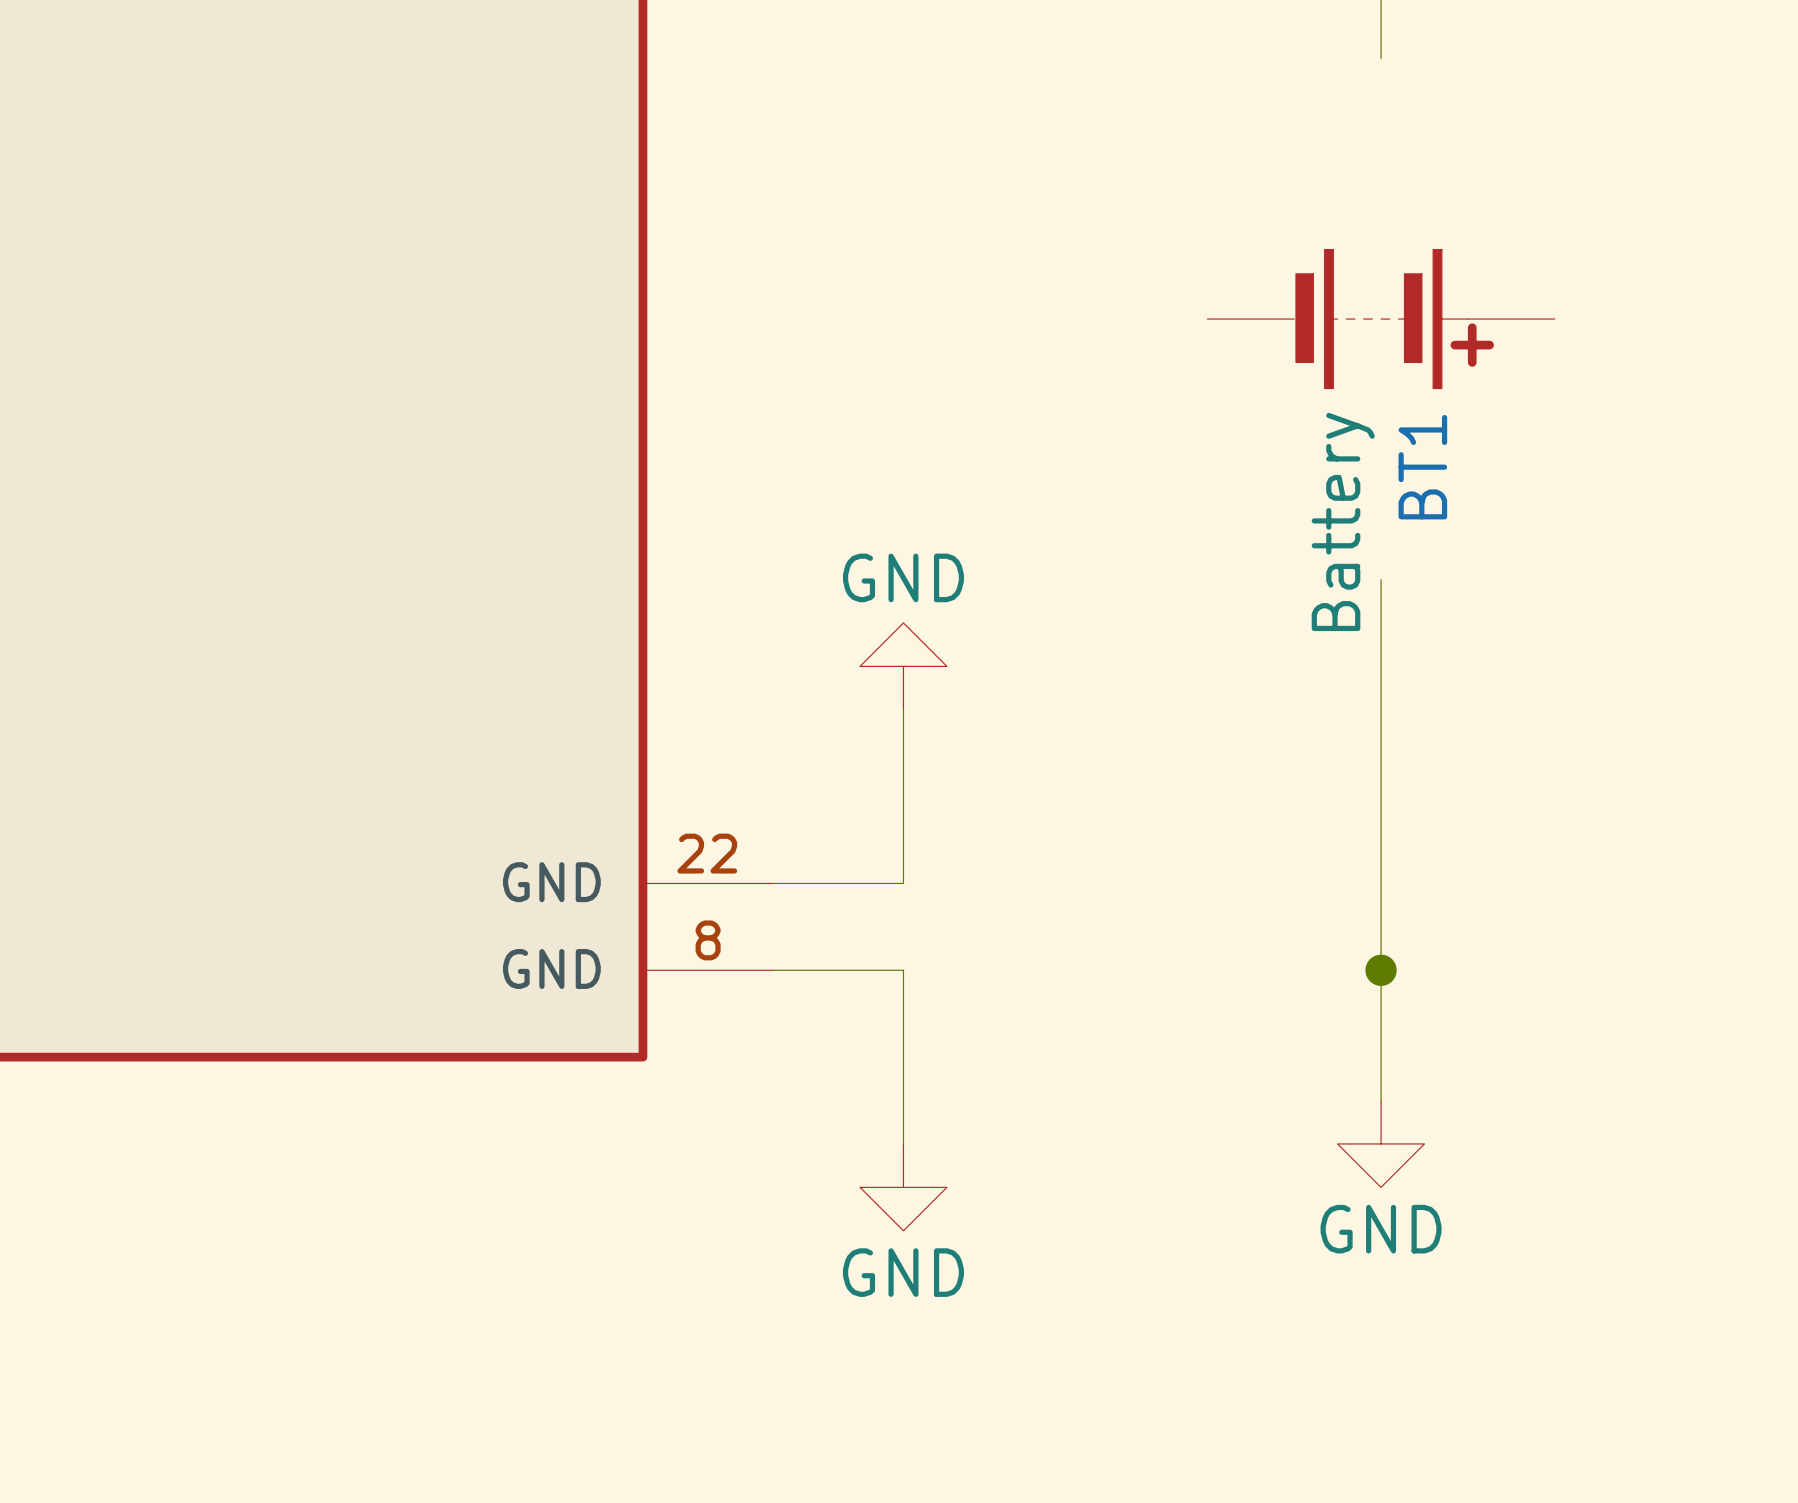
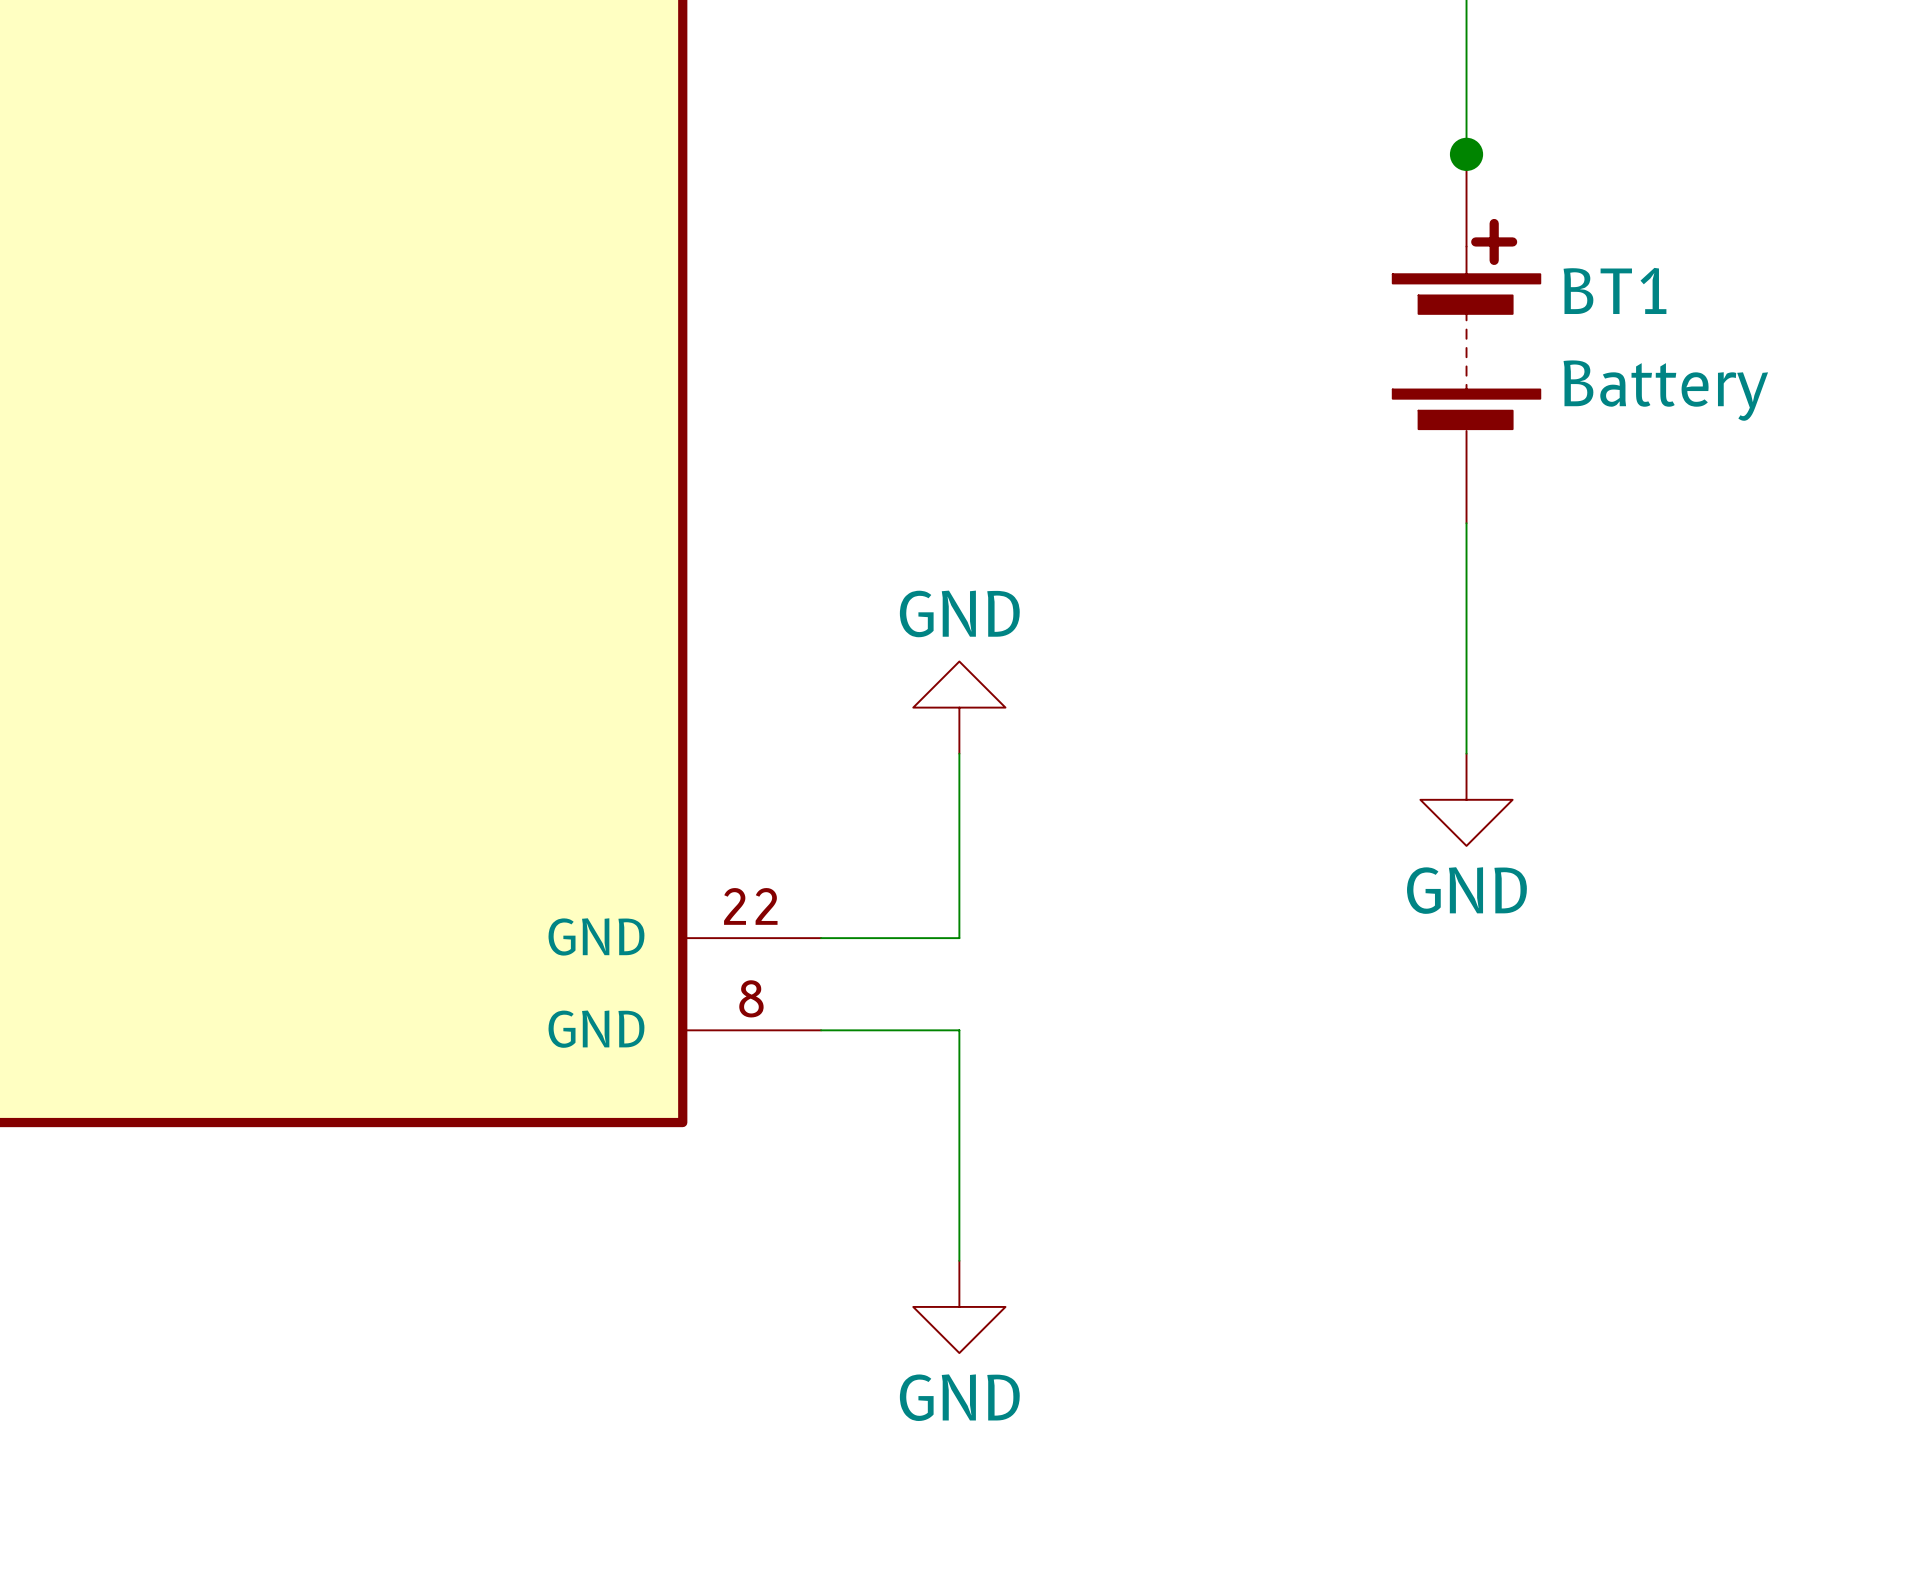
wire: none -> (1466, 62) (1466, 154)
junction: none -> (1466, 154)
BT1 rotation: 0° (1394, 319) -> 90° counterclockwise (1466, 324)
wire: none -> (1466, 523) (1466, 615)
wire: (1381, 709) (1381, 1100) -> none
power symbol: none -> GND (1466, 799)
junction: (1381, 970) -> none
power symbol: GND (1381, 1143) -> none
power symbol position: GND (903, 1187) -> GND (959, 1306)

